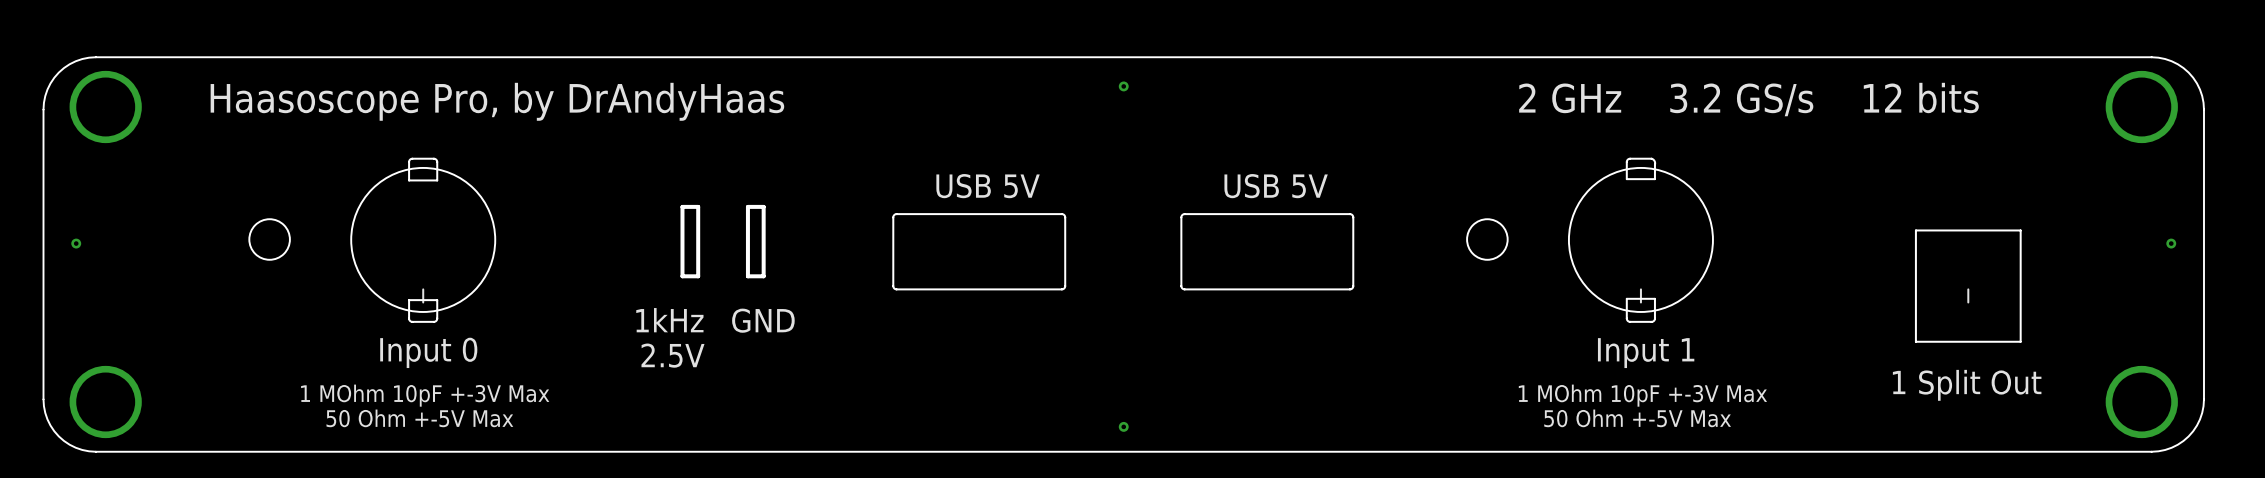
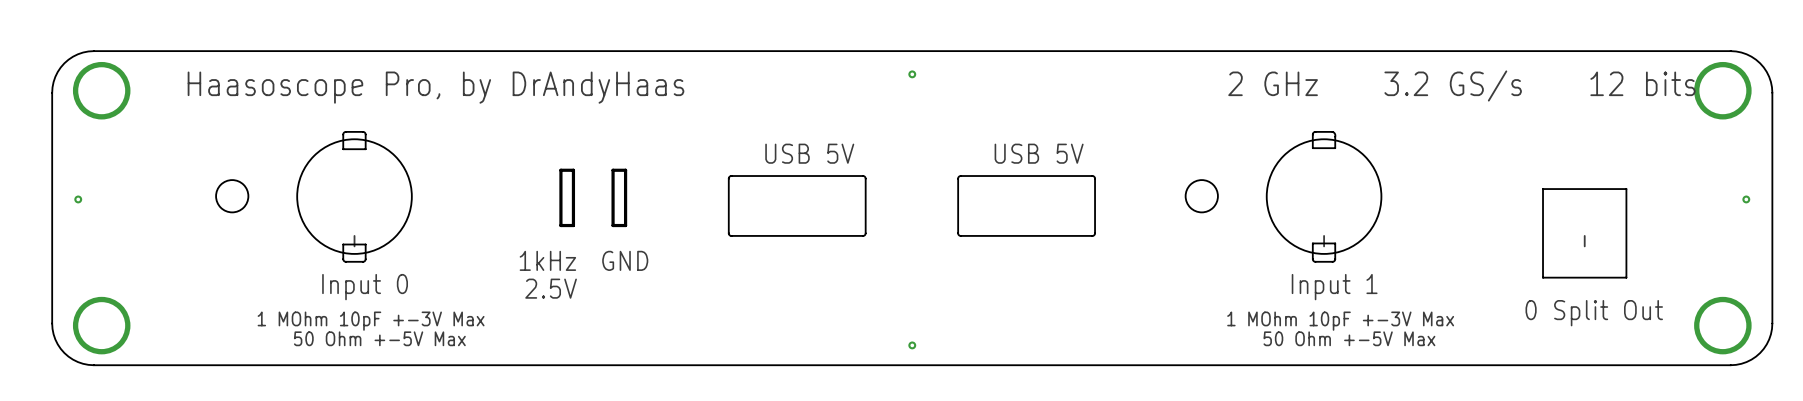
text: 1 Split Out (1967, 385) -> 0 Split Out (1594, 313)

